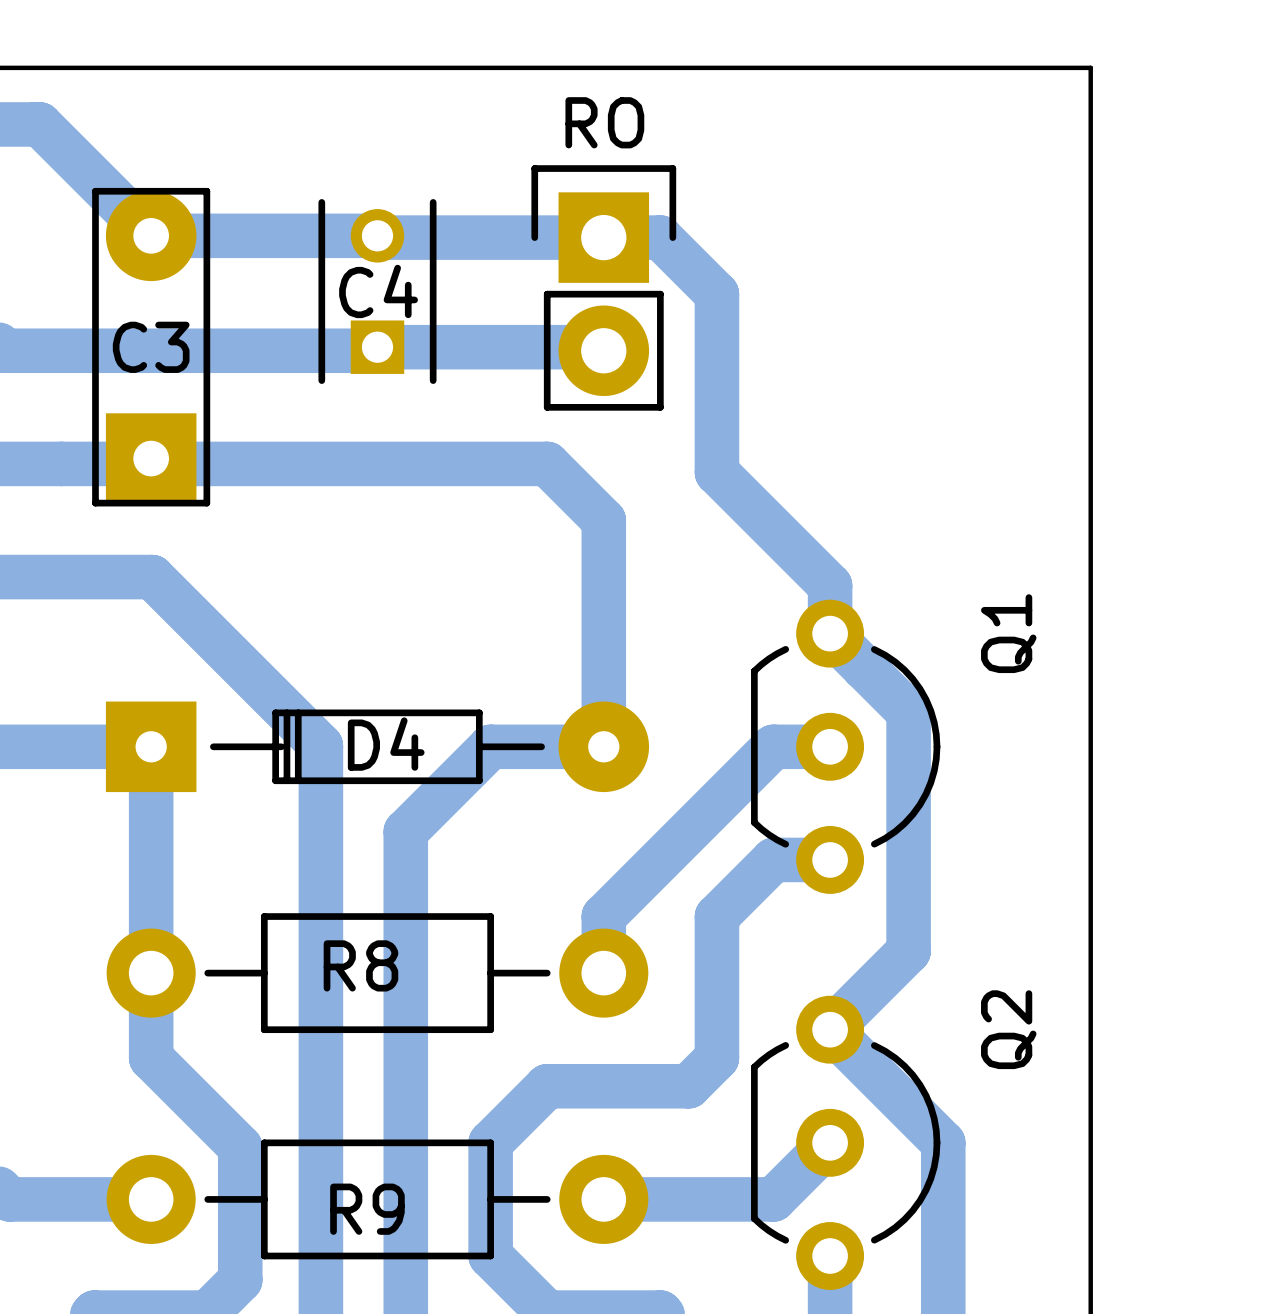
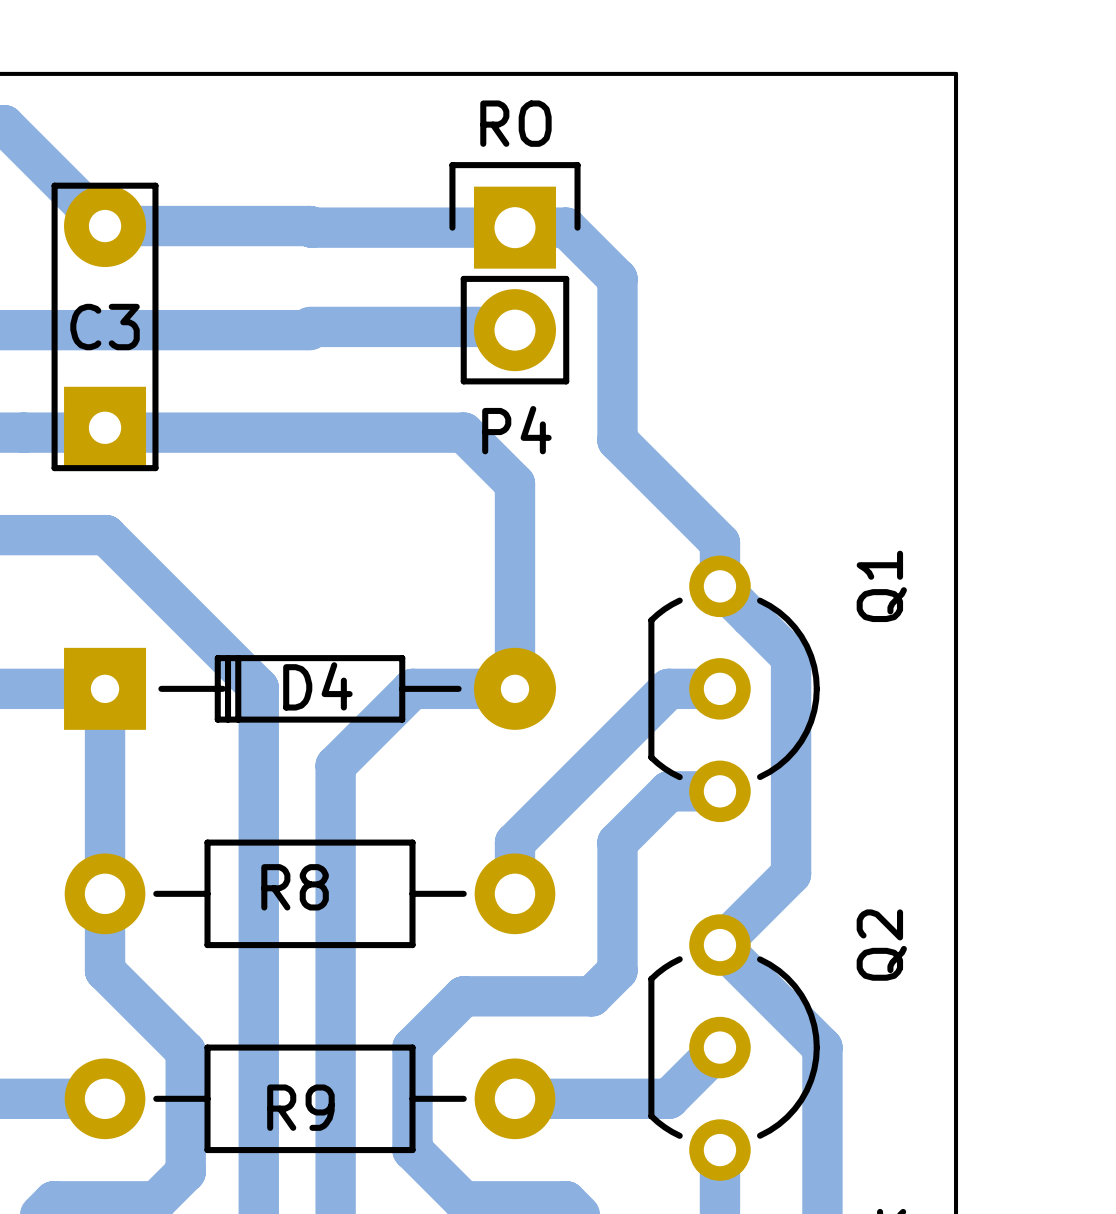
C4: (377, 291) -> none
P4 name: none -> P4 (516, 430)

